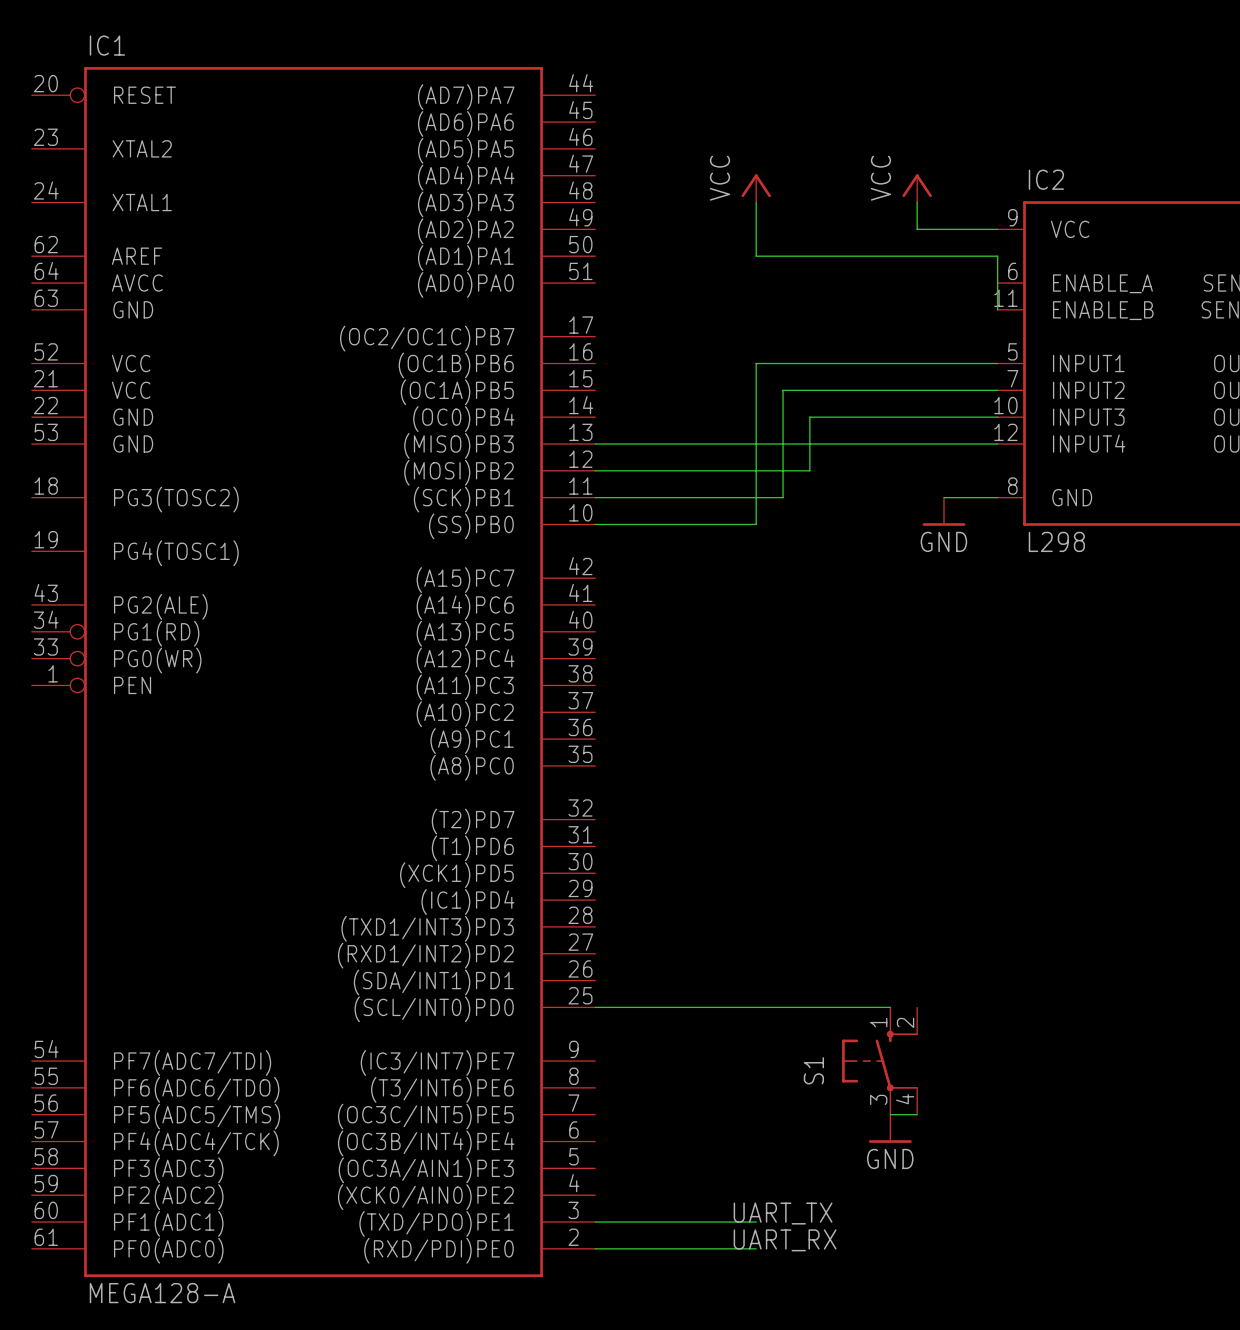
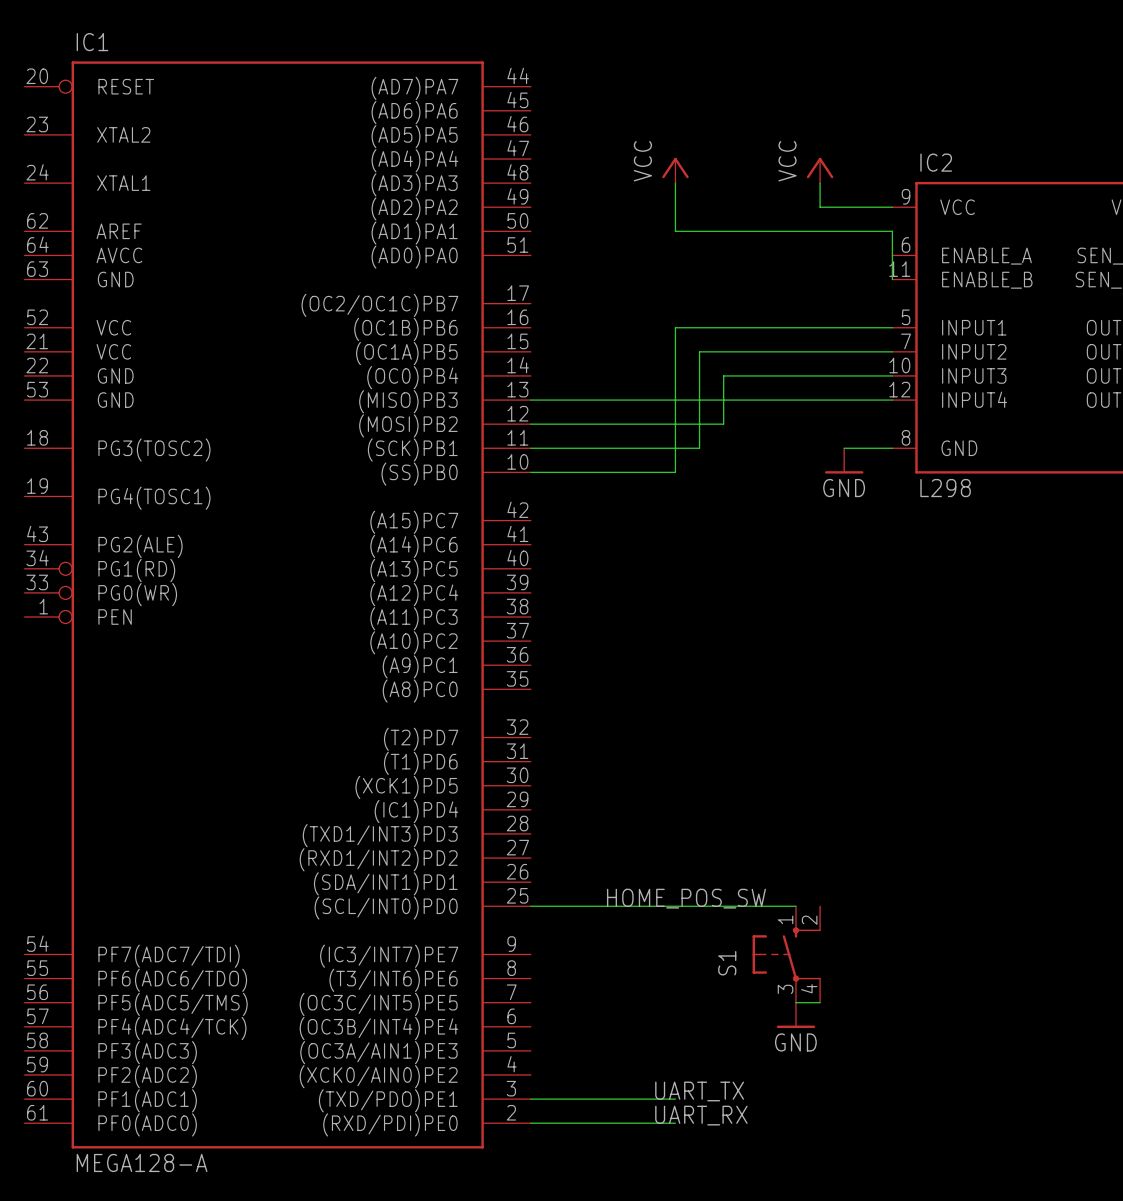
label: none -> HOME_POS_SW (686, 898)

